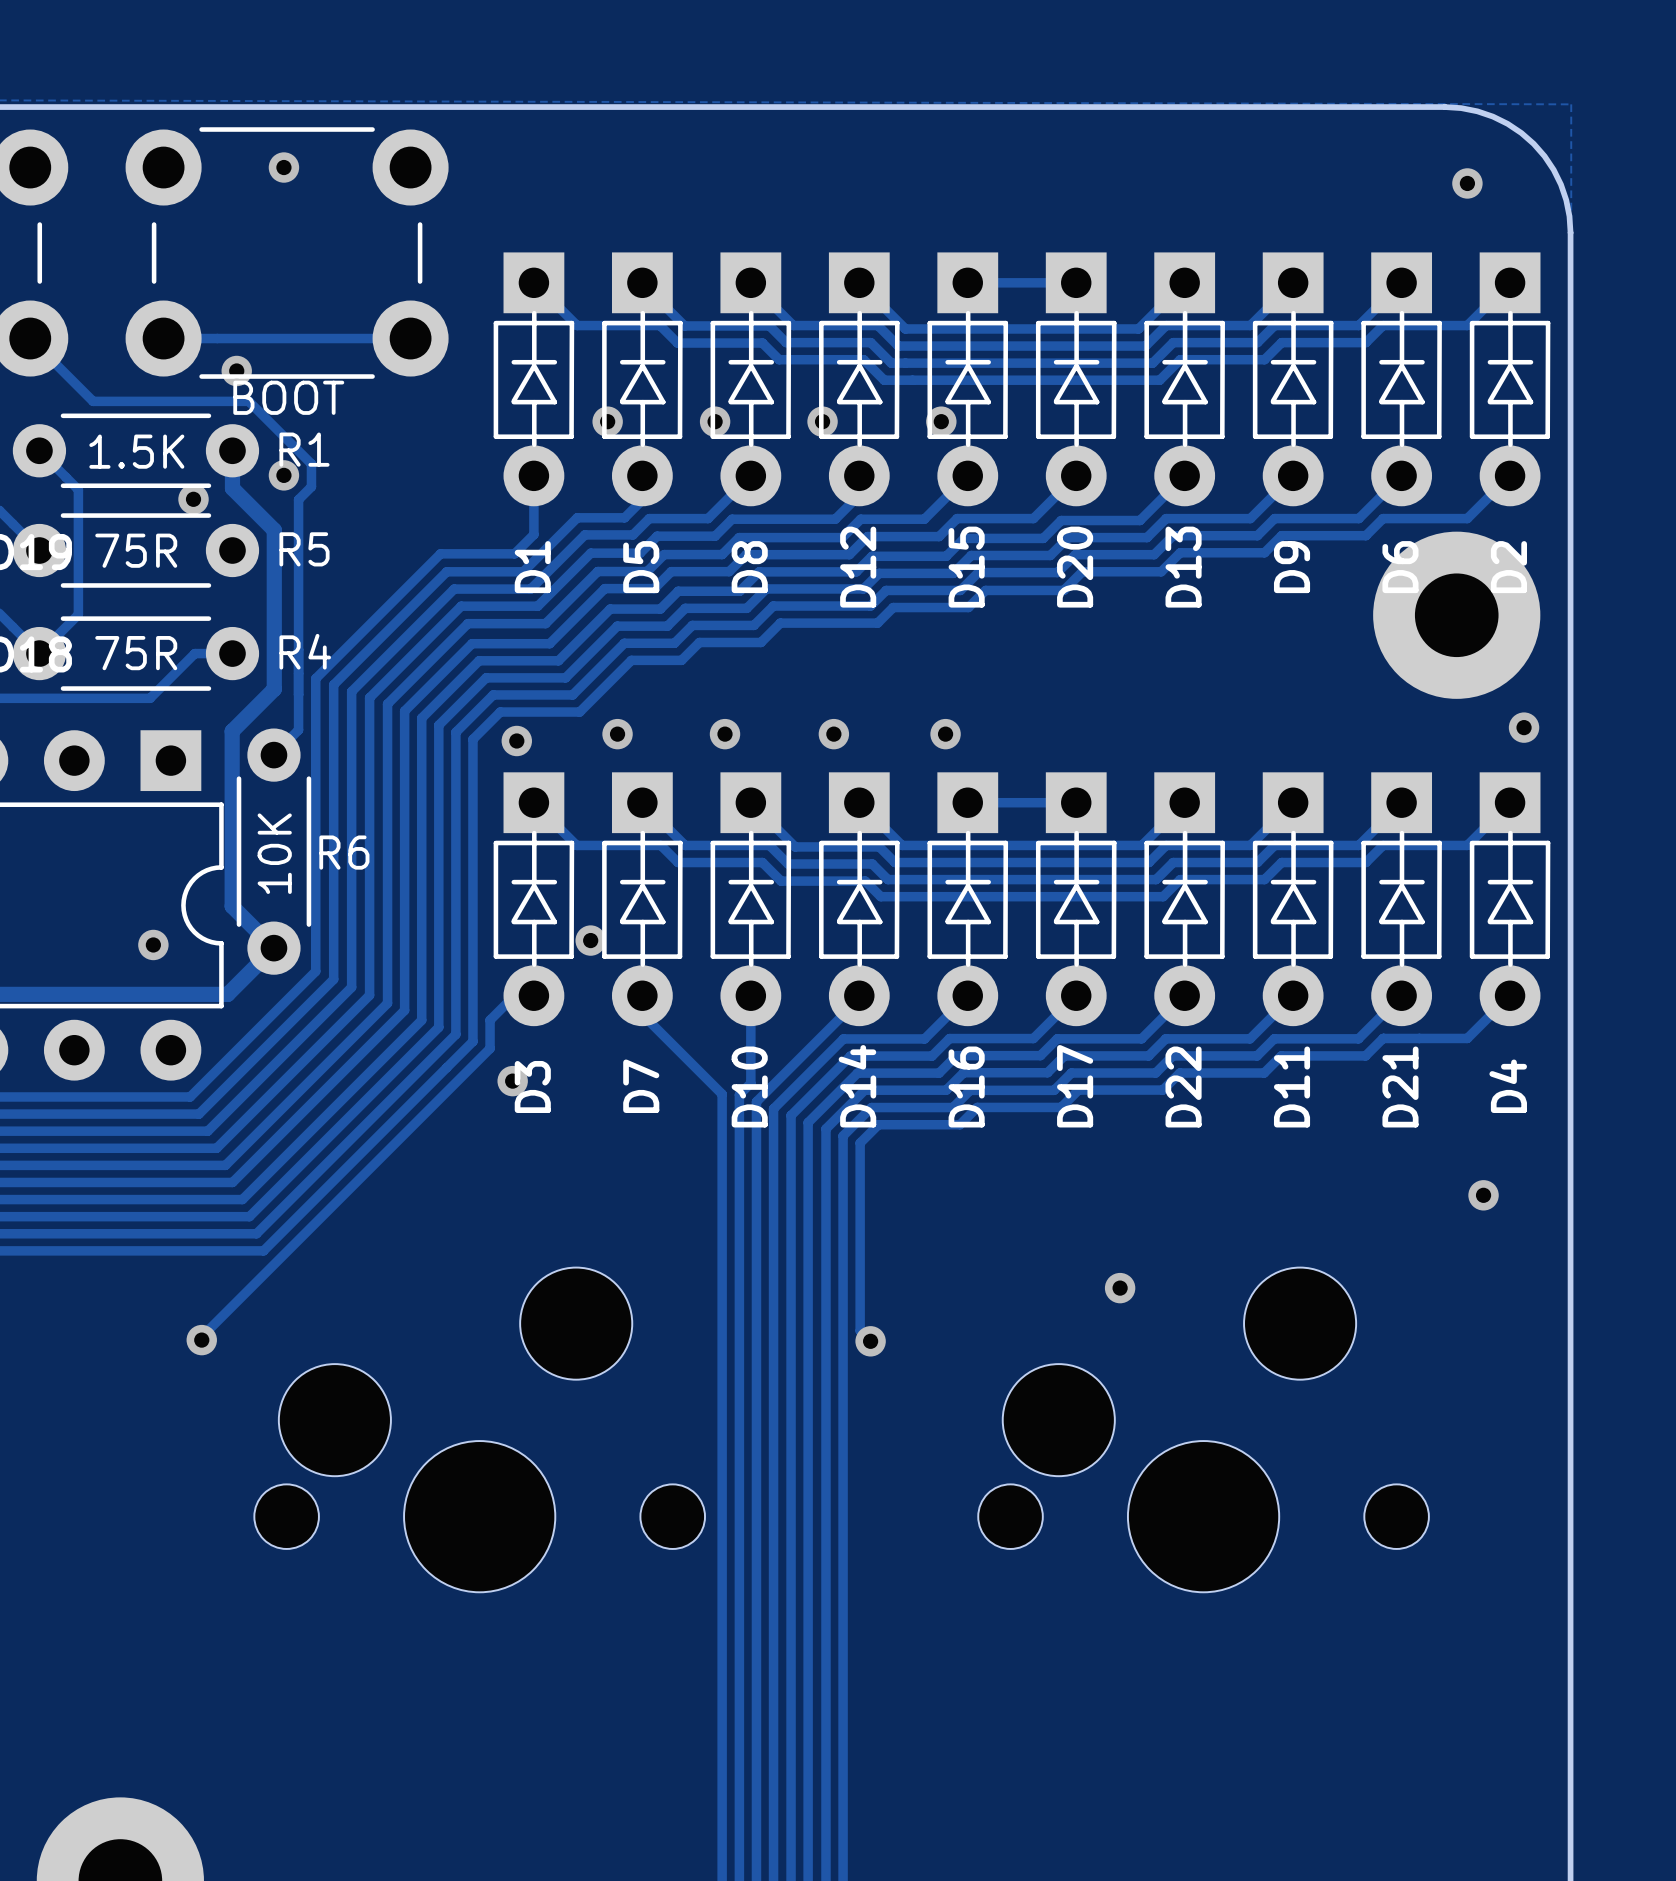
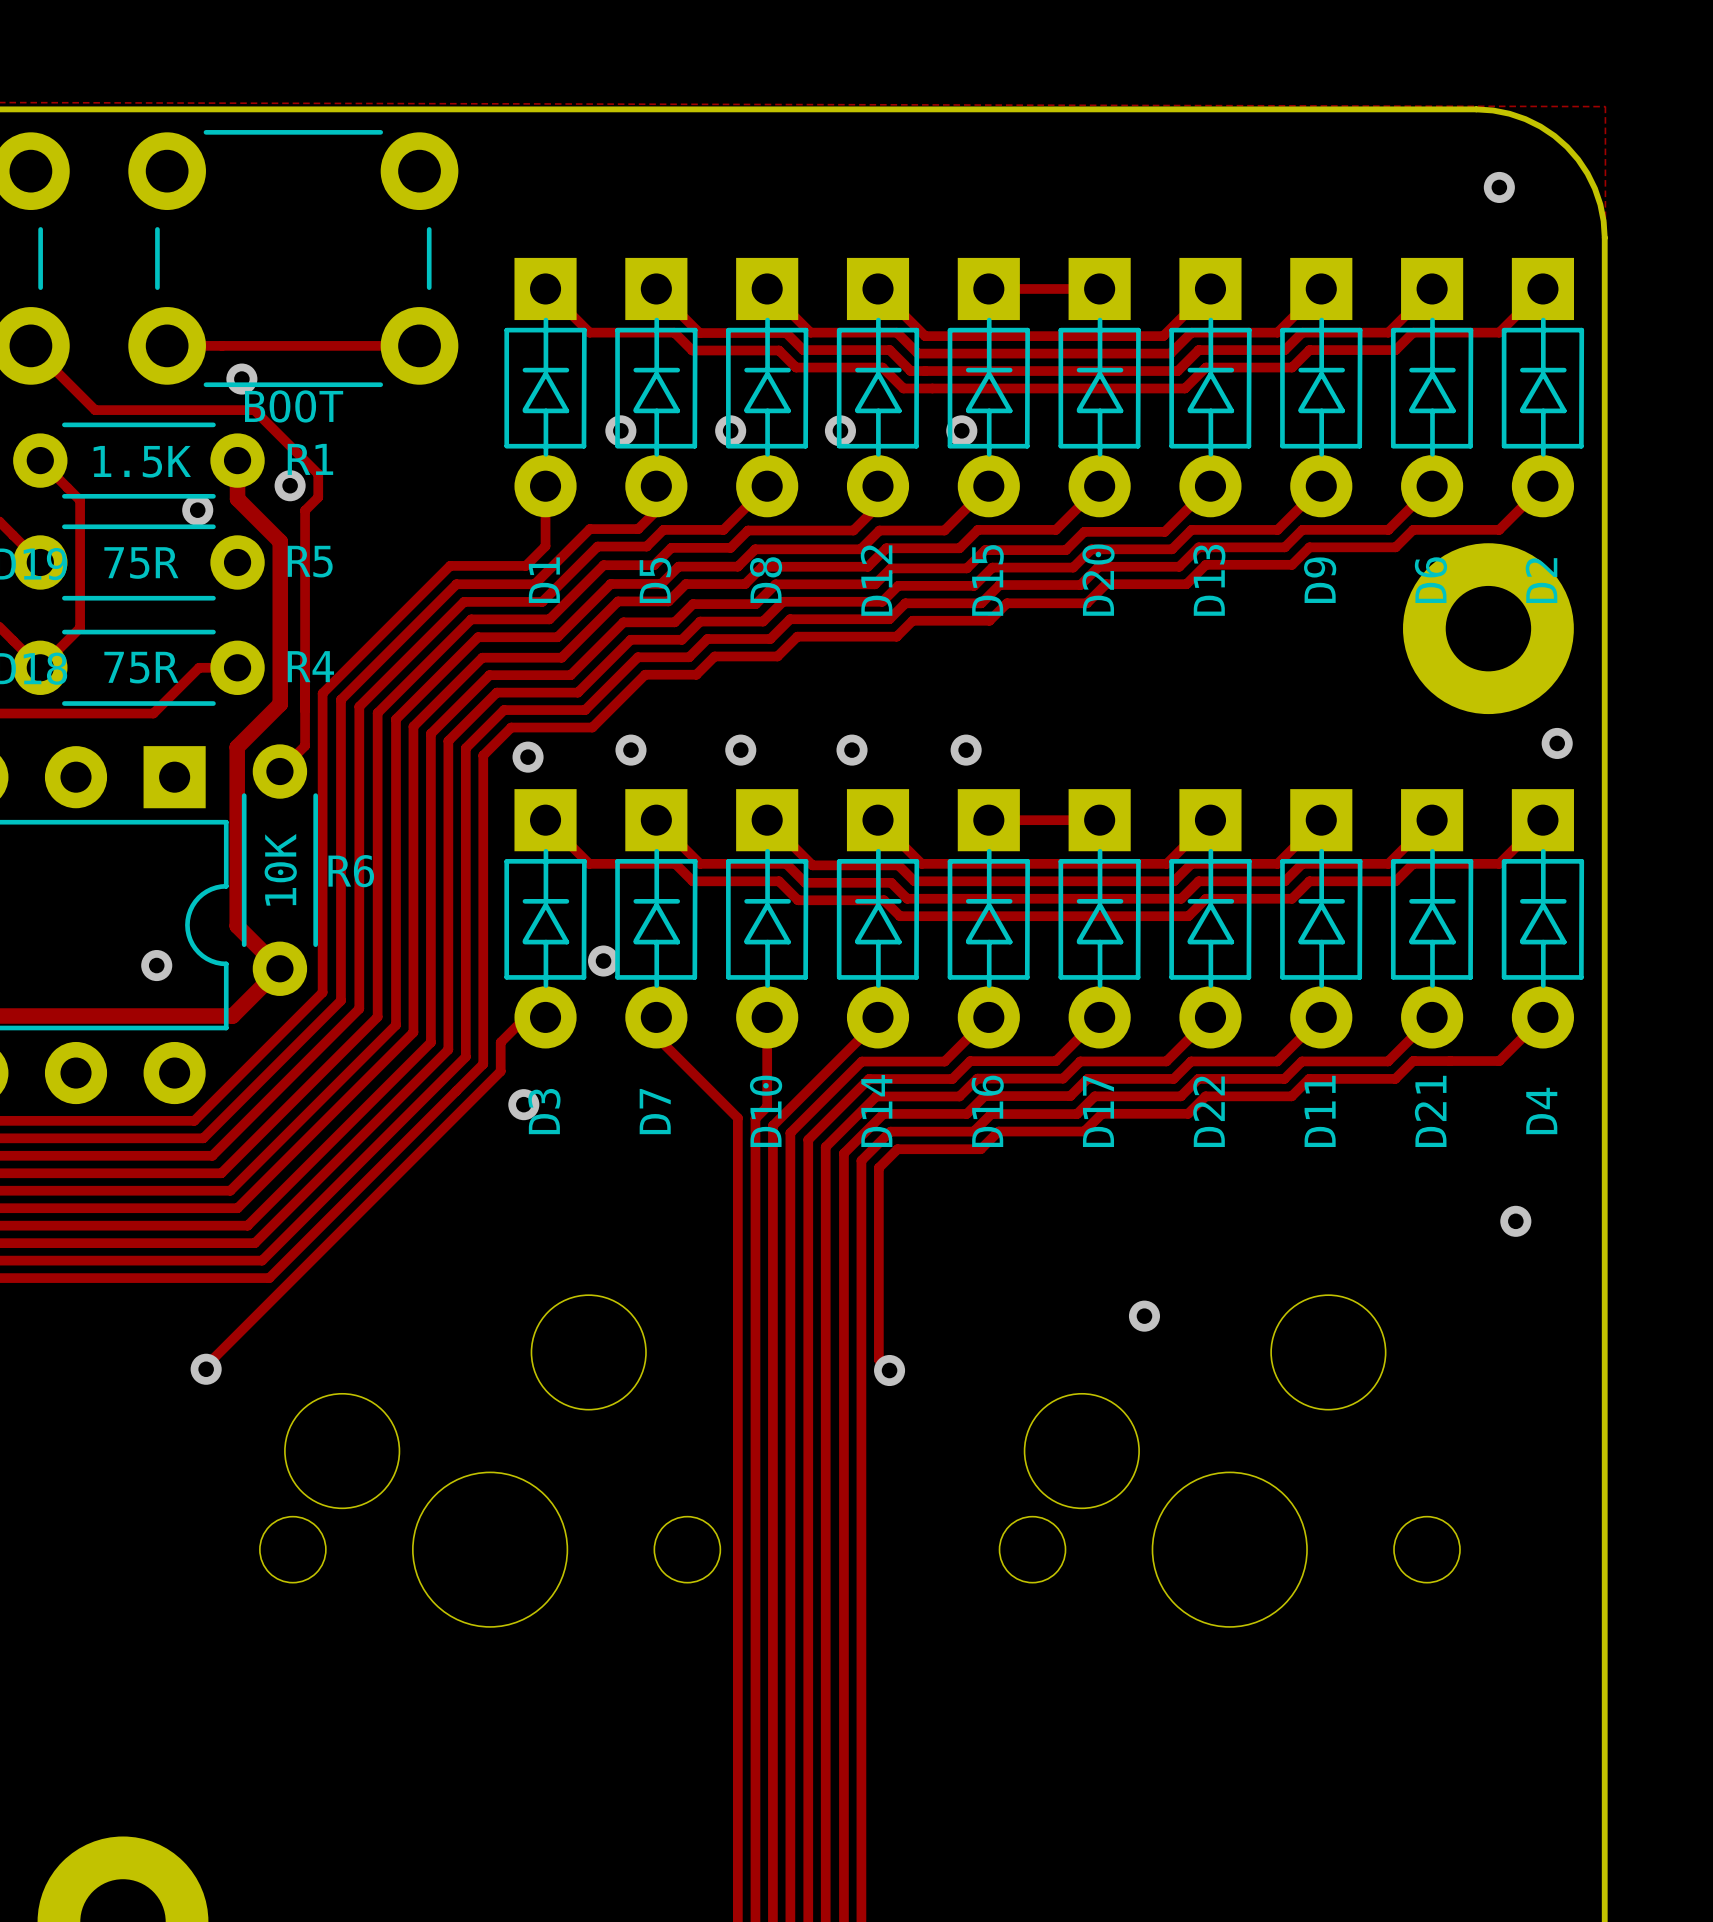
via: (283, 167) -> none

